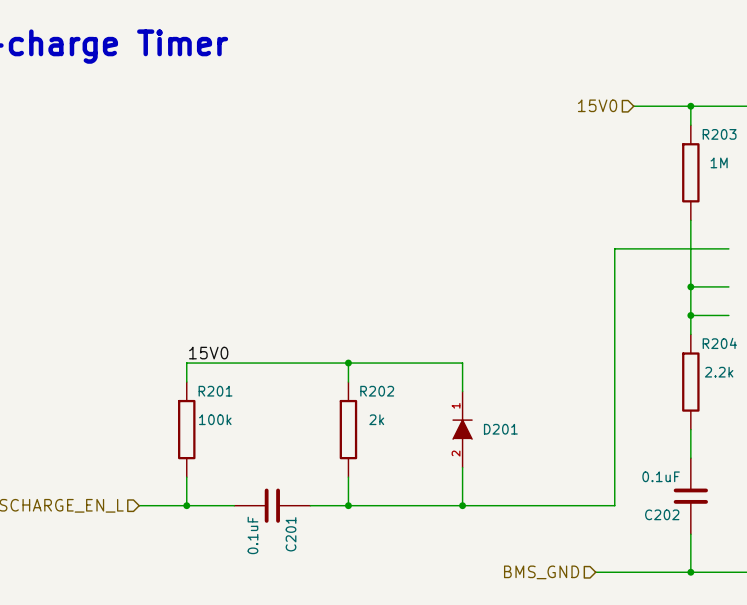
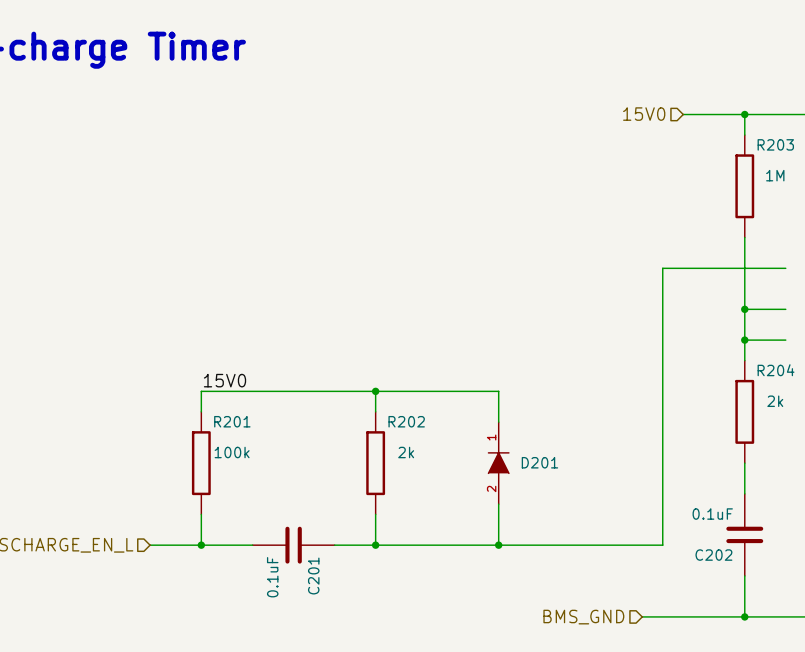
R204 value: 2.2k (719, 372) -> 2k (775, 401)

